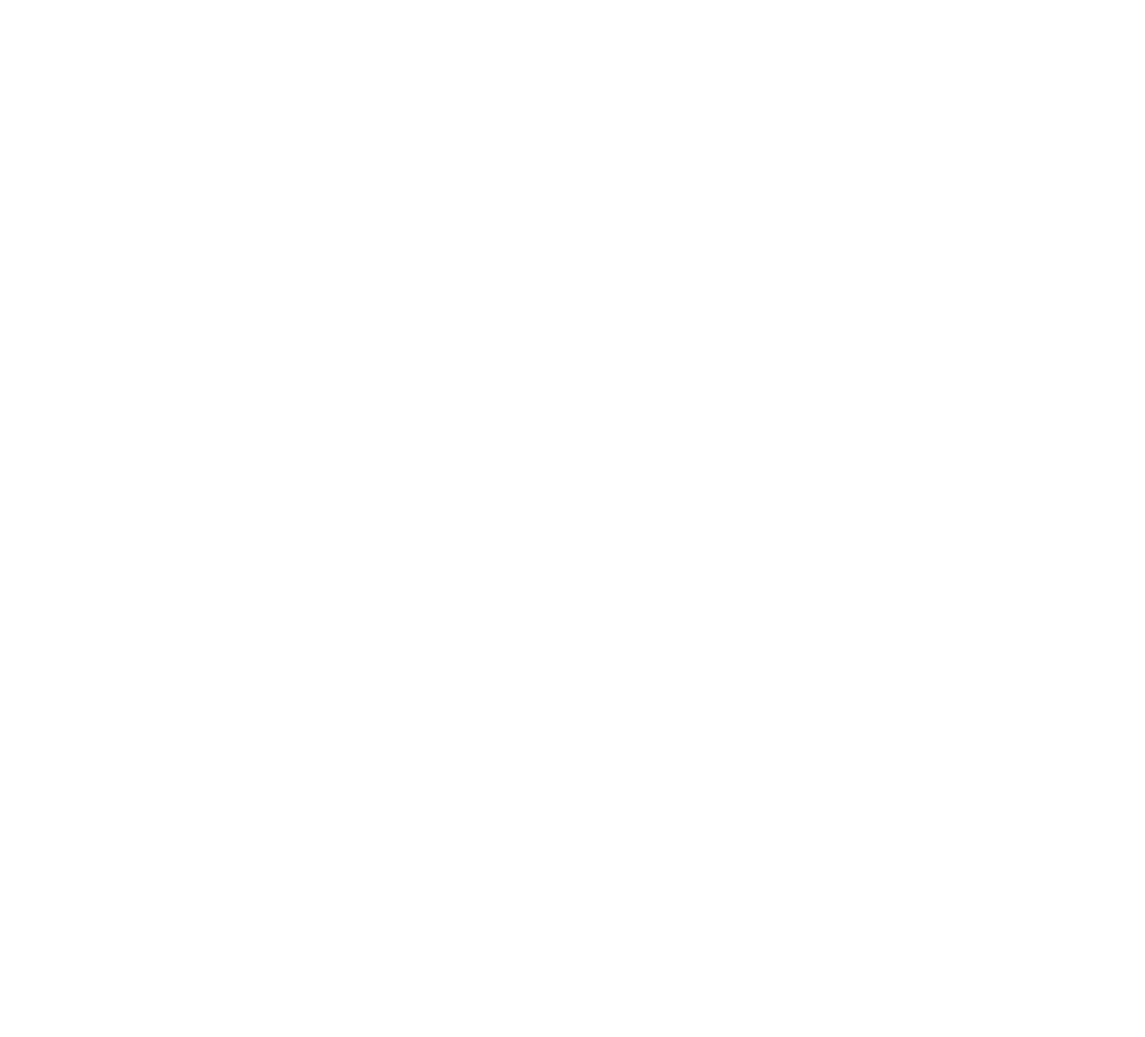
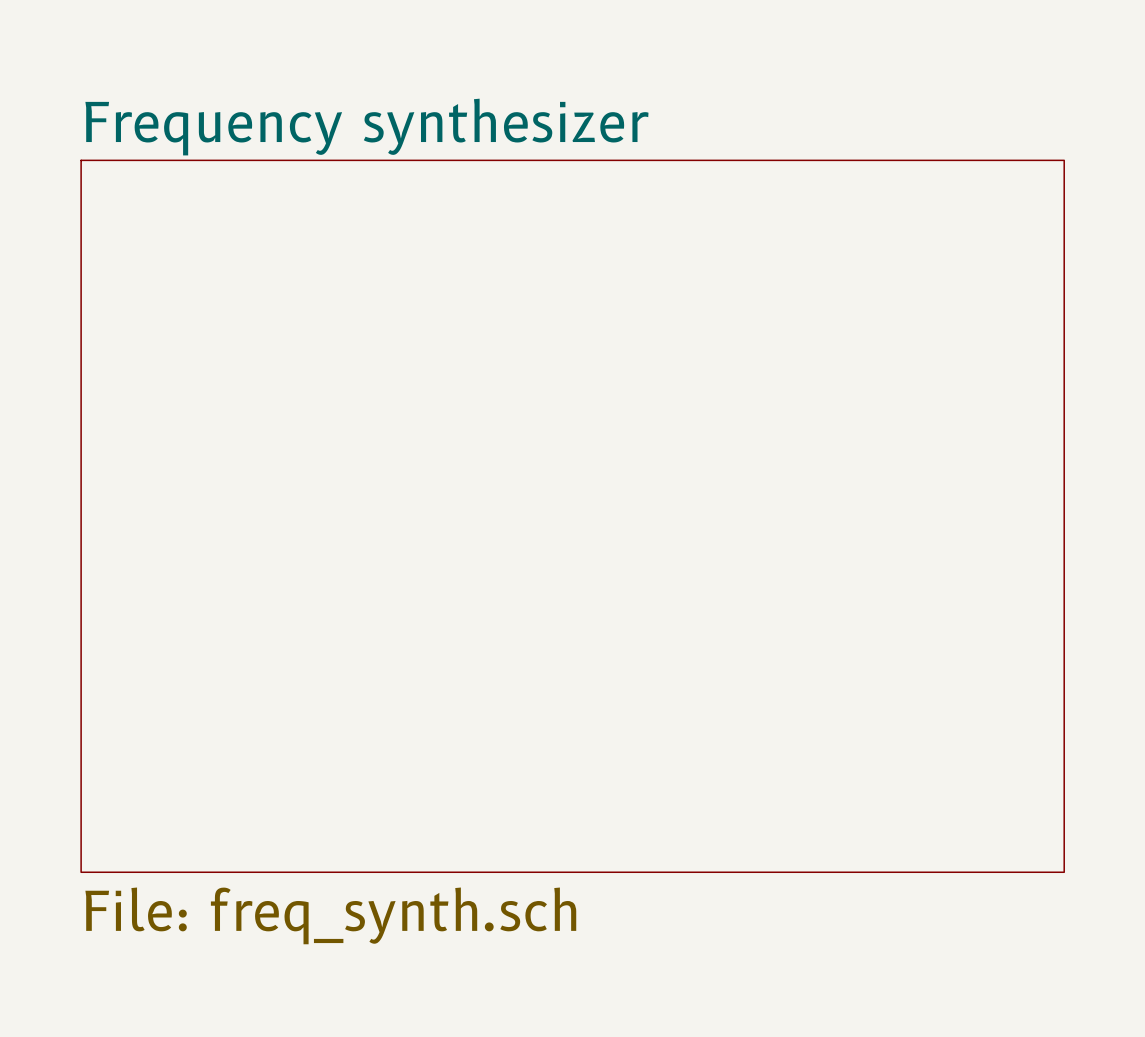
sheet Frequency synthesizer: none -> File: freq_synth.sch (572, 516)

